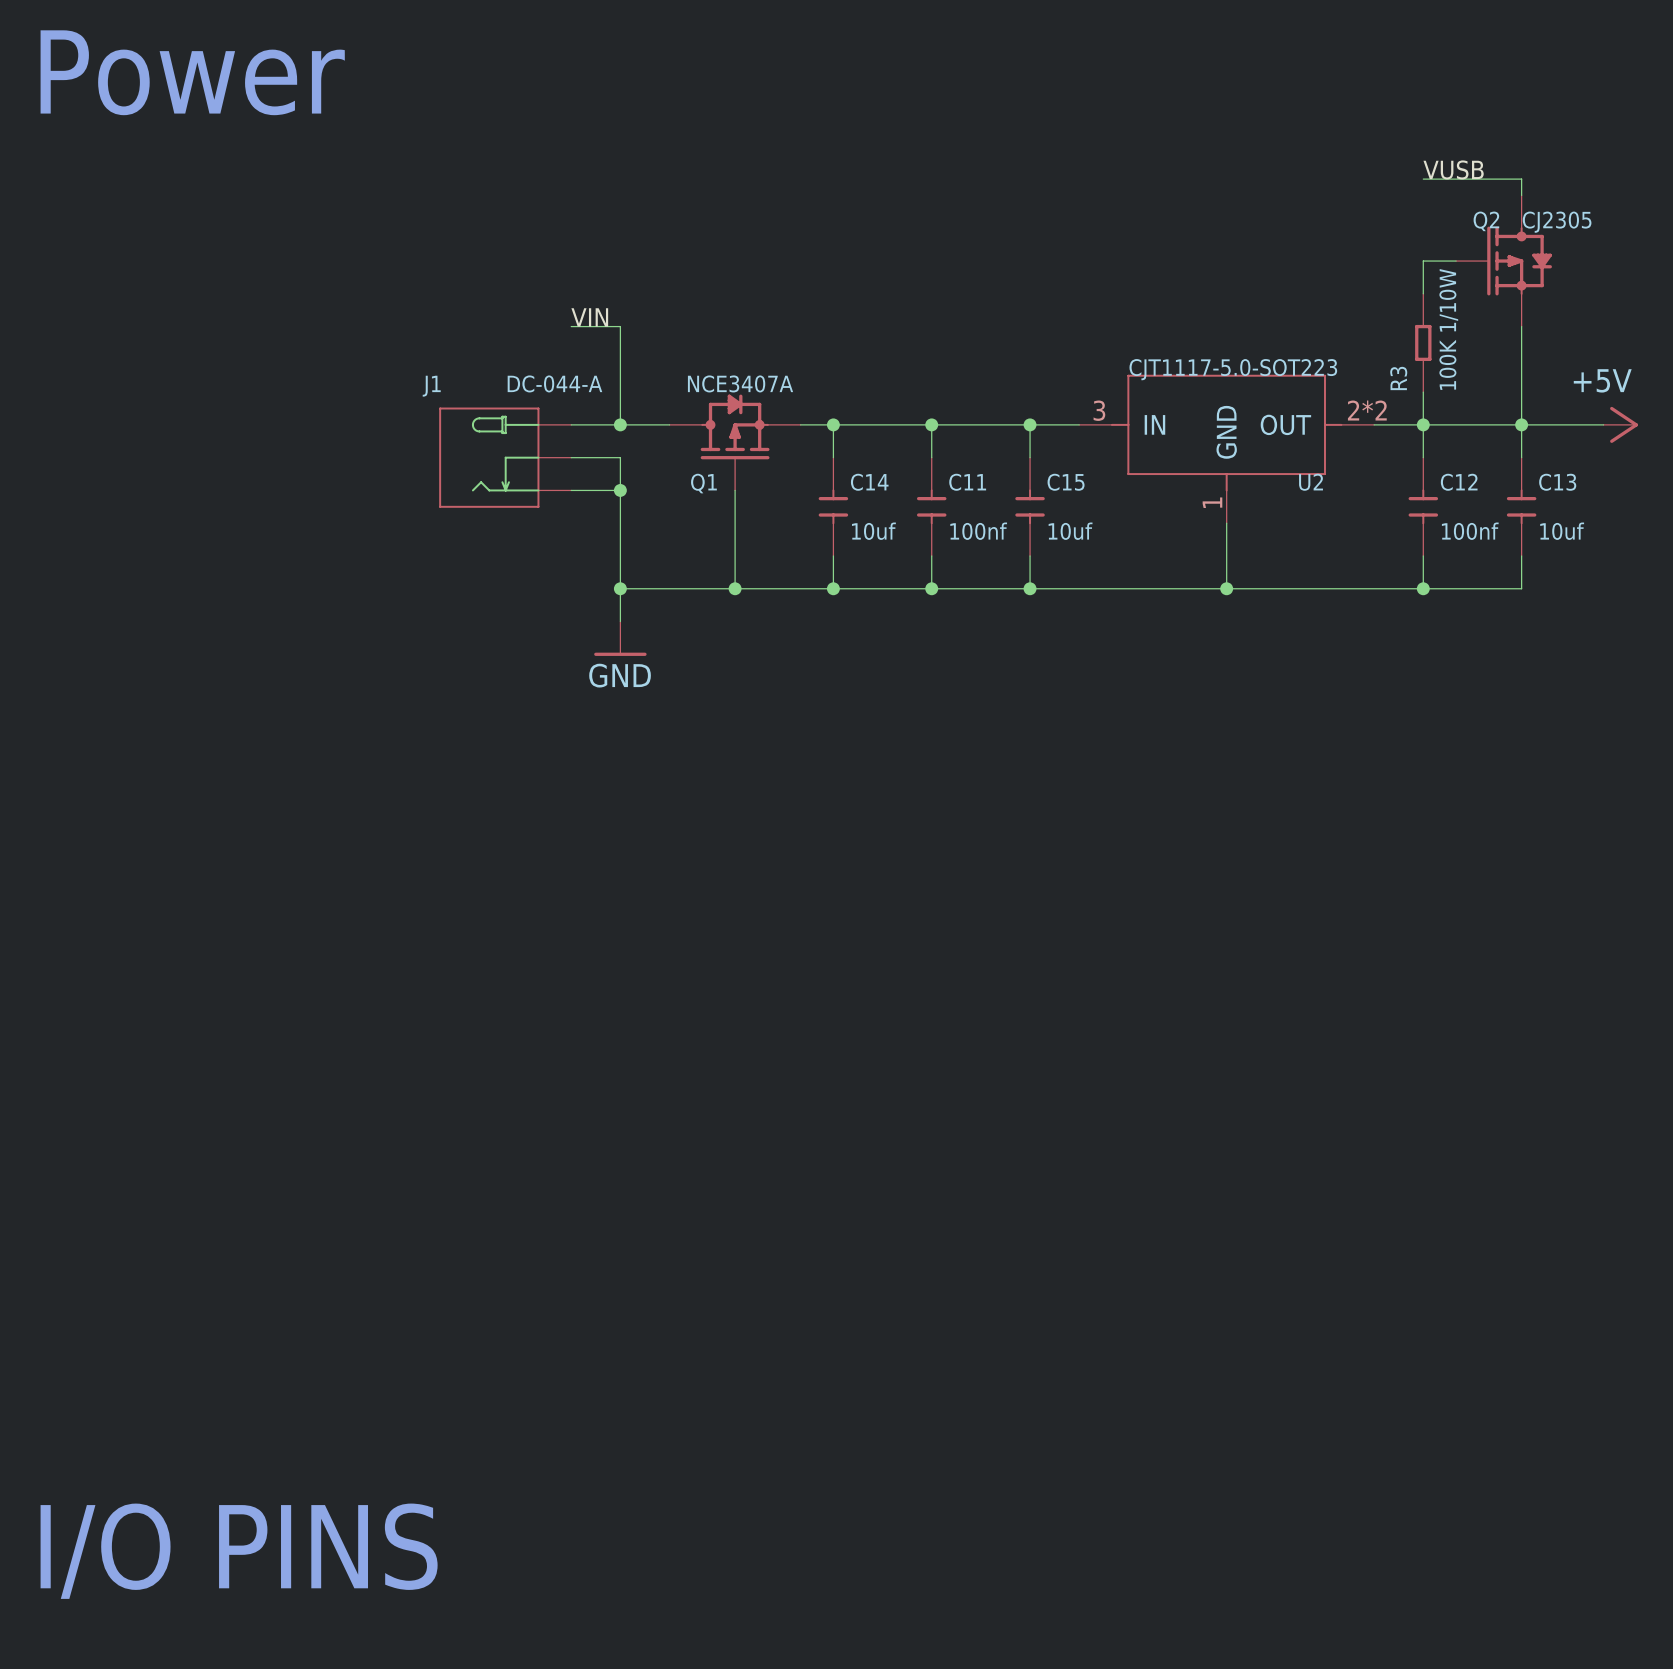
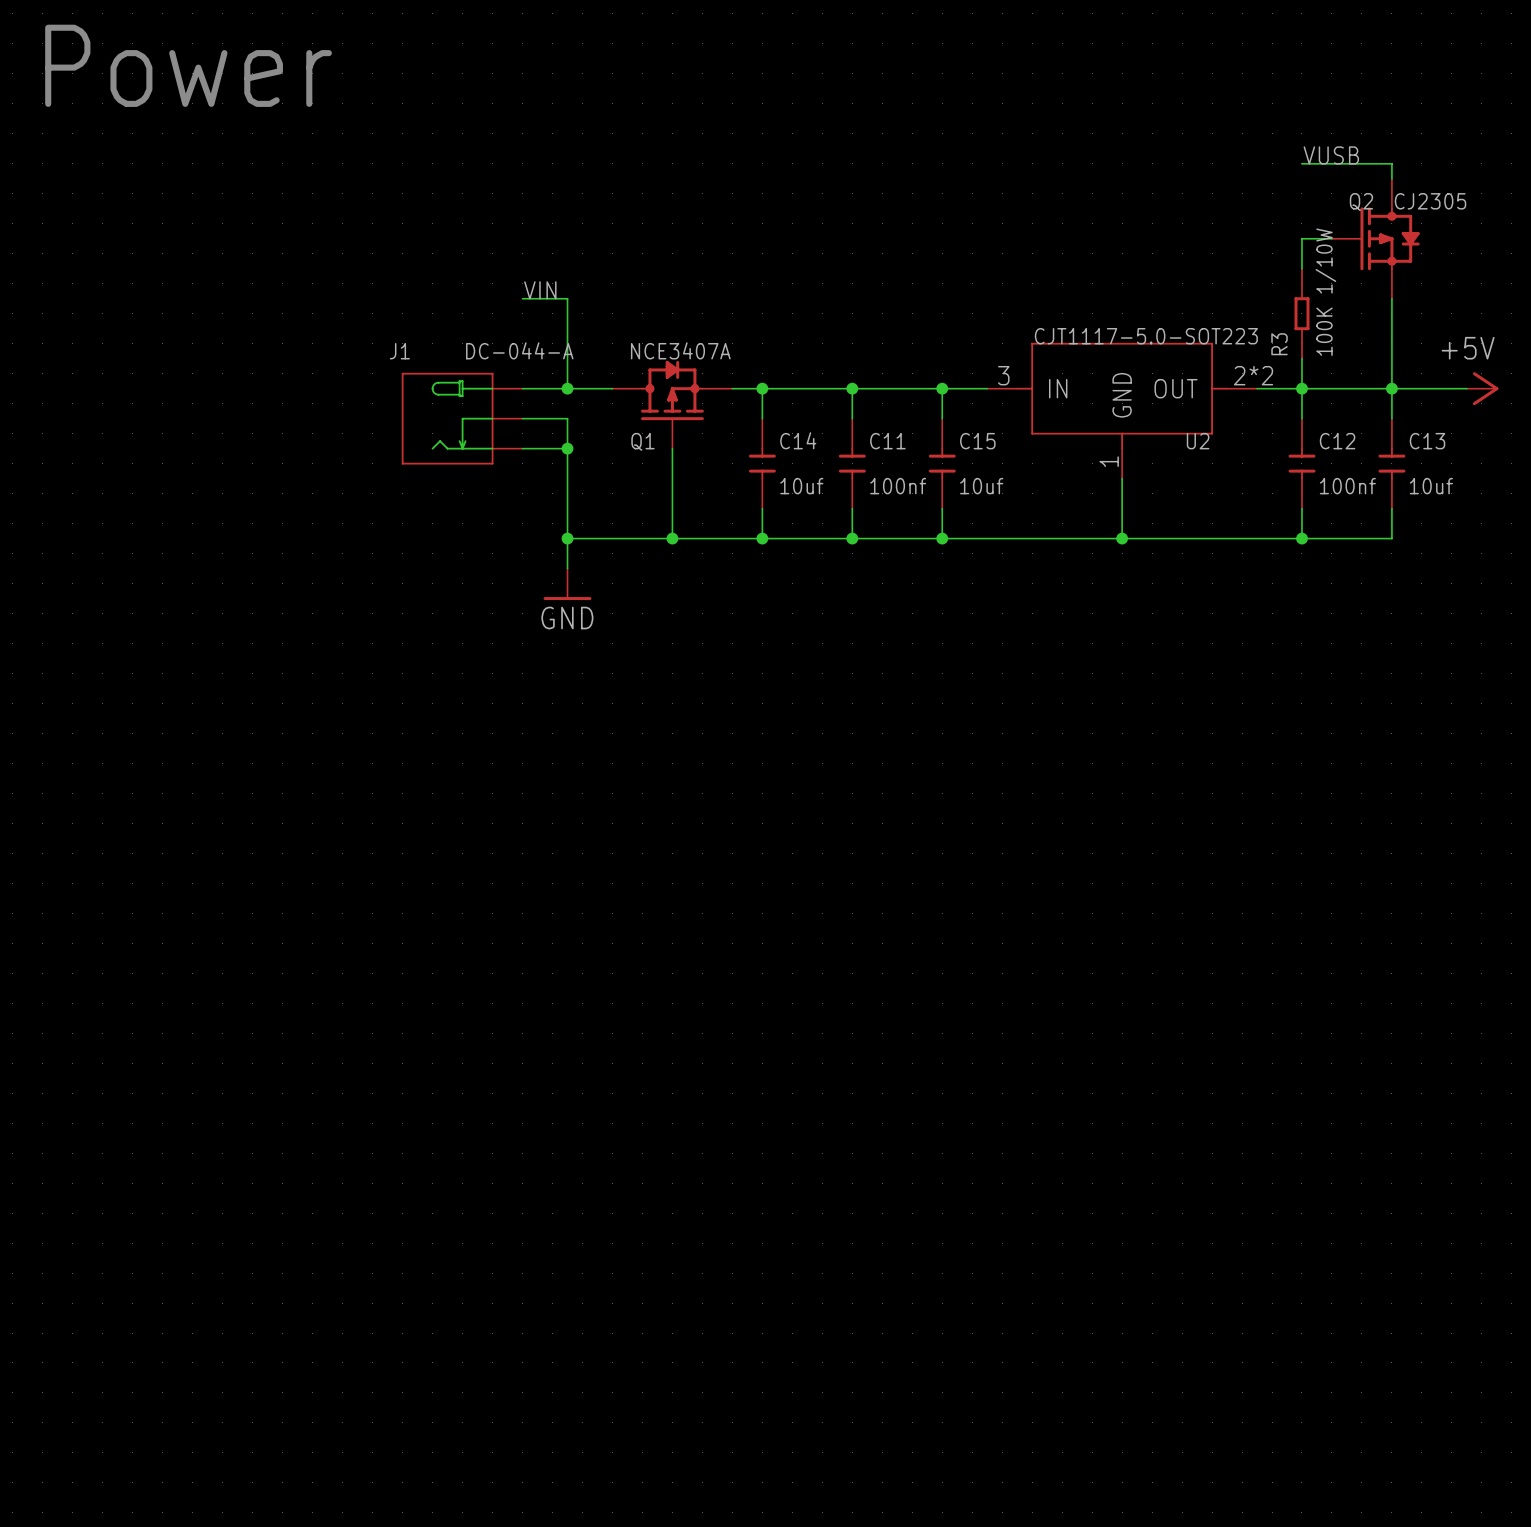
text: I/O PINS (239, 1551) -> none

